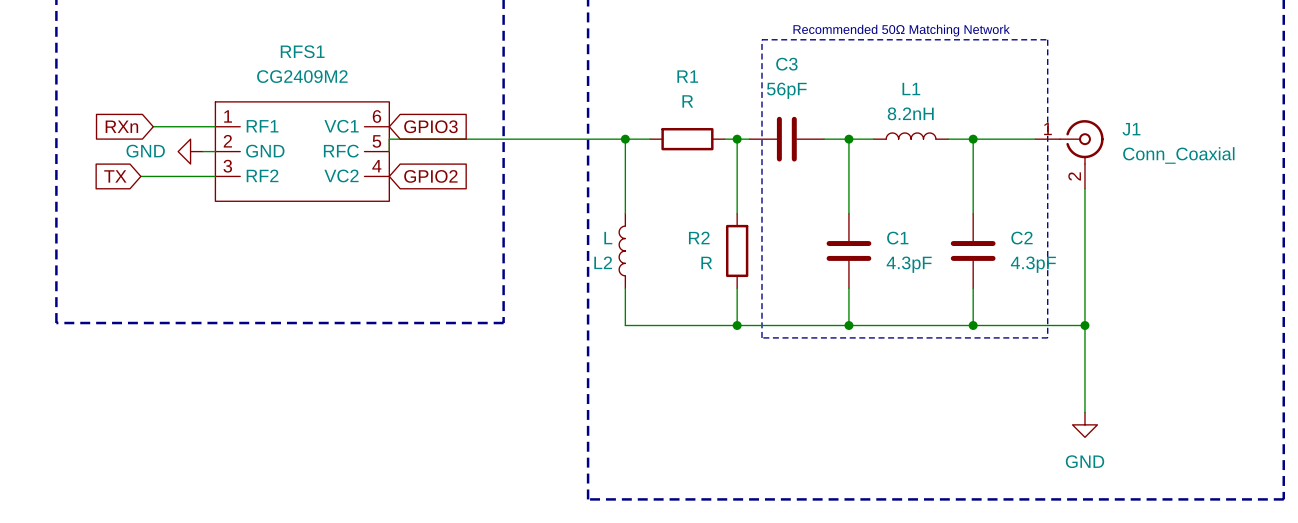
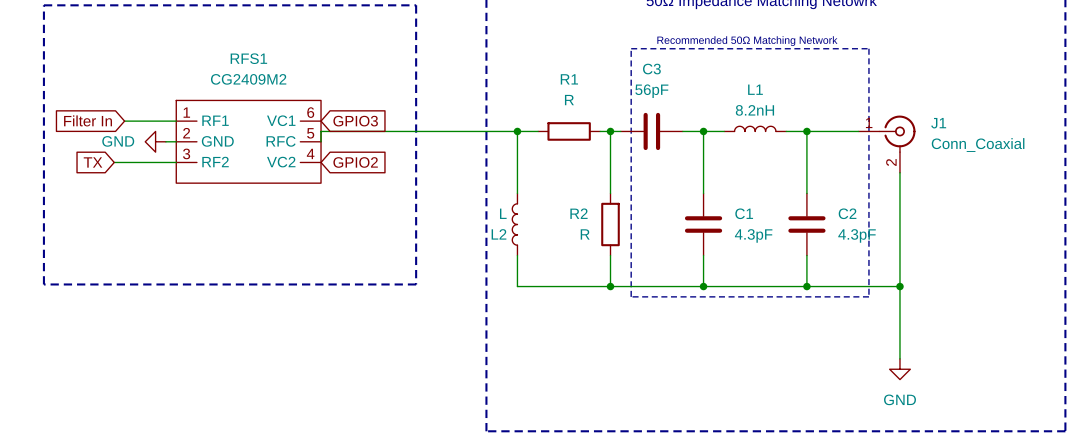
global label: RXn (121, 126) -> Filter In (88, 120)

